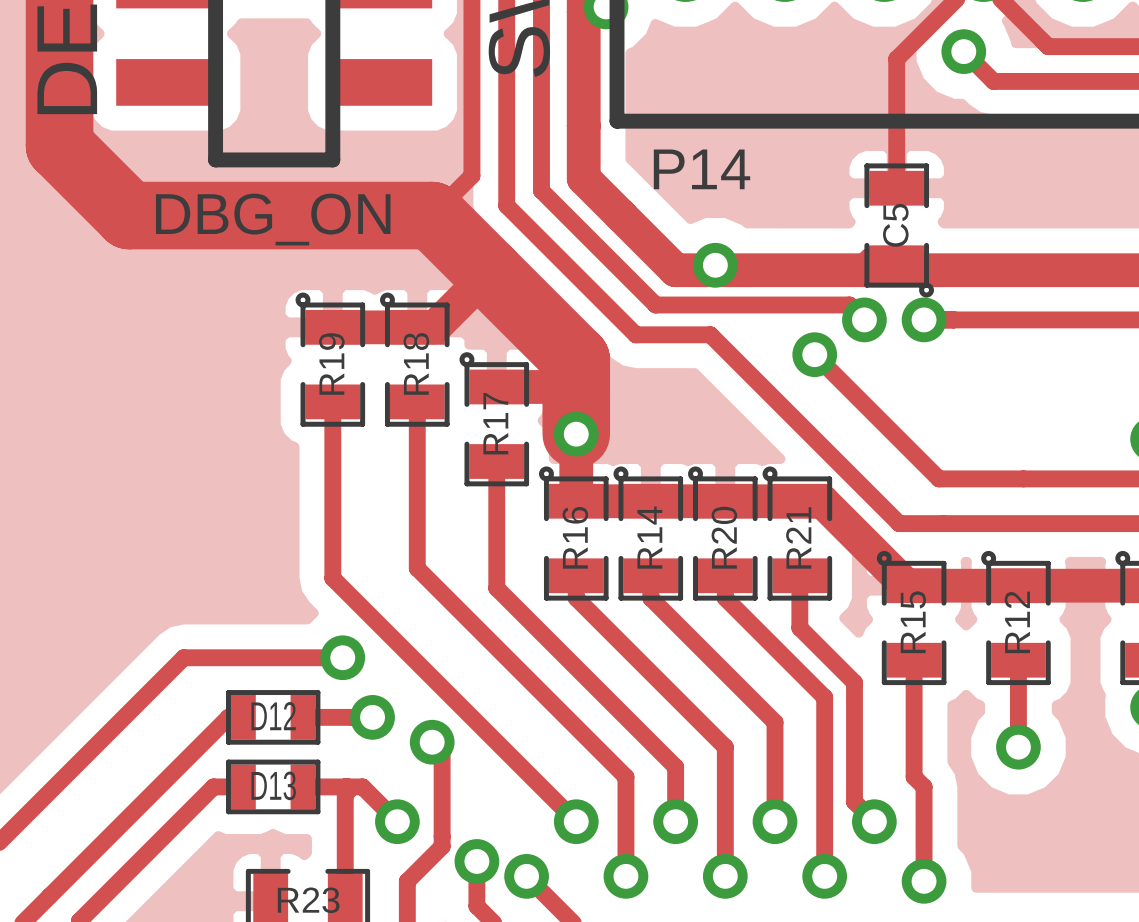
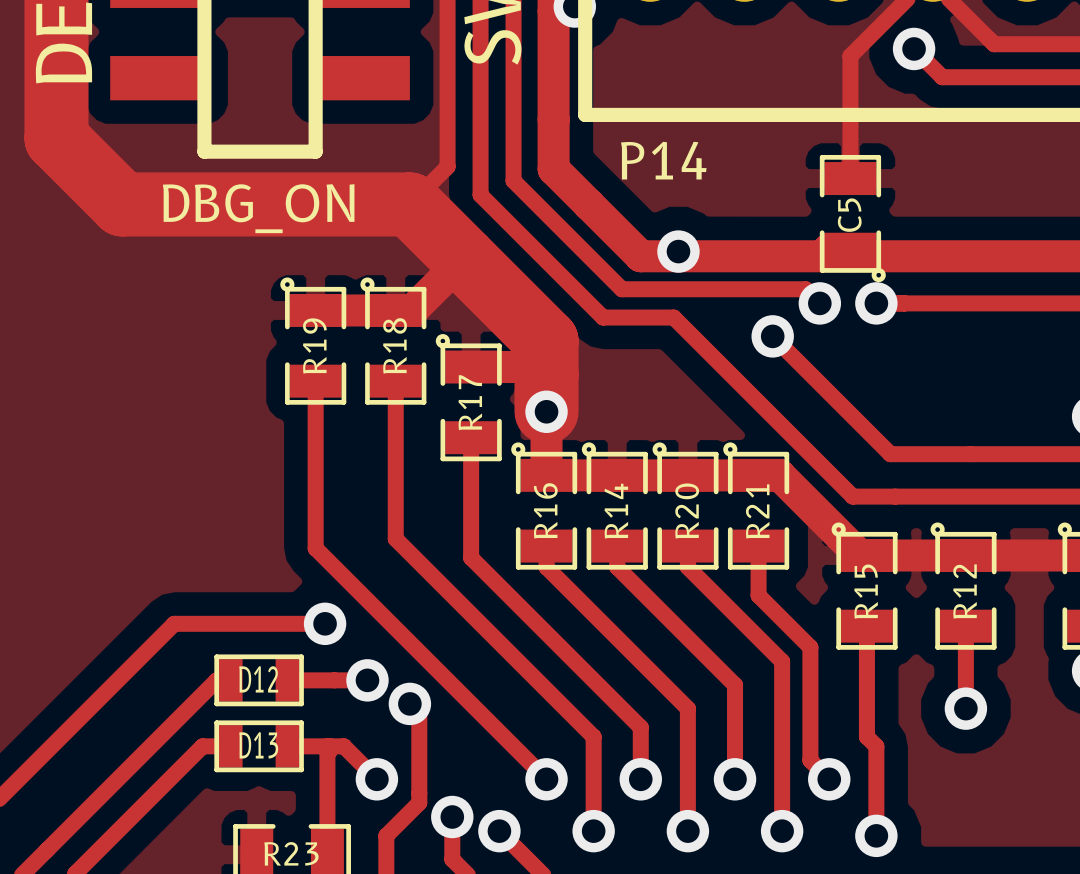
via position: (372, 717) -> (367, 680)

